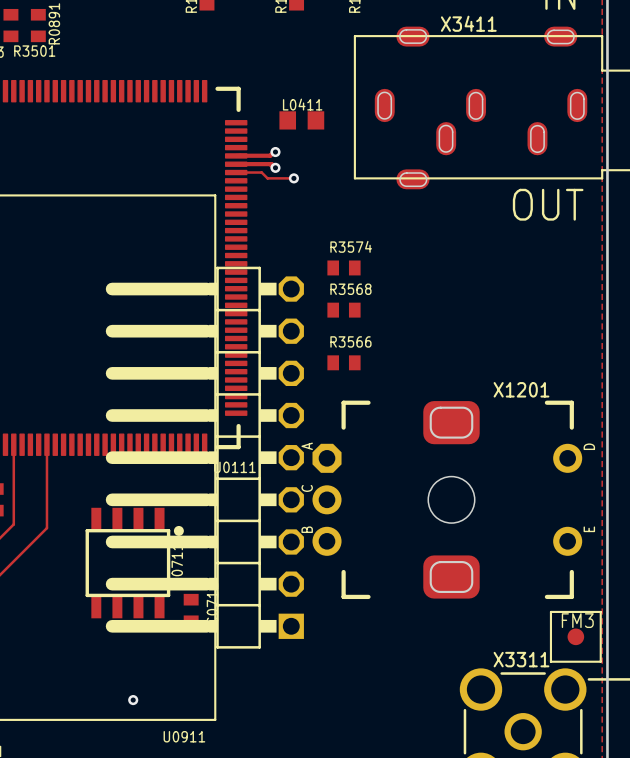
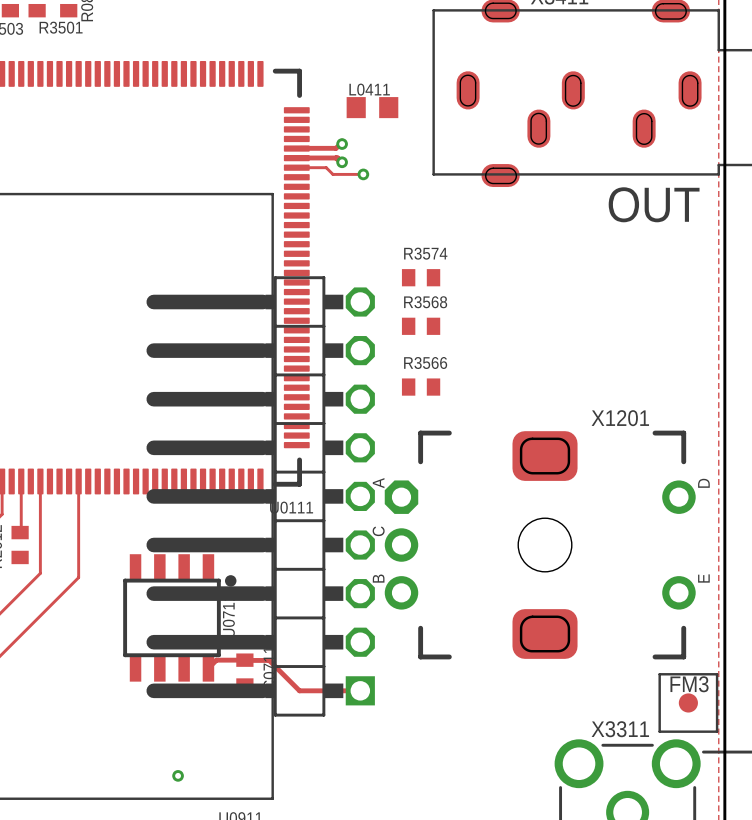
track: none -> (208, 668) (216, 660) (269, 660) (299, 690) (360, 690)

